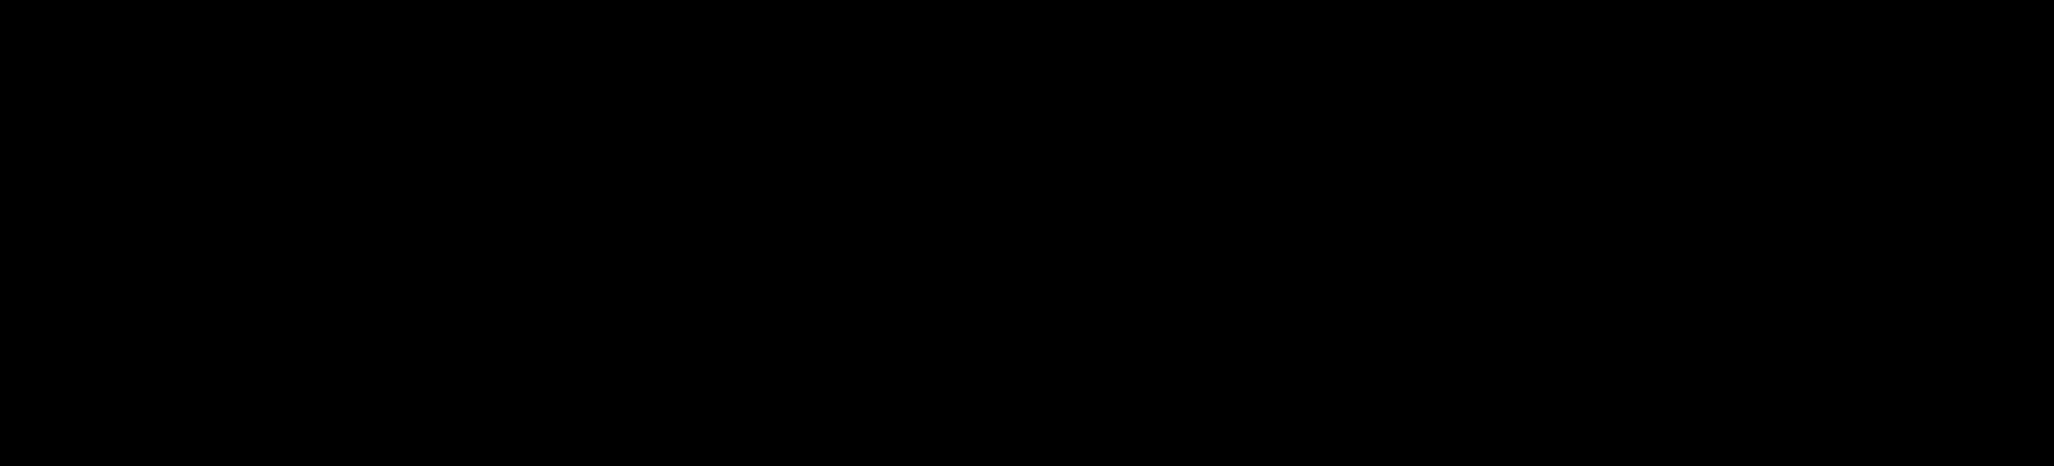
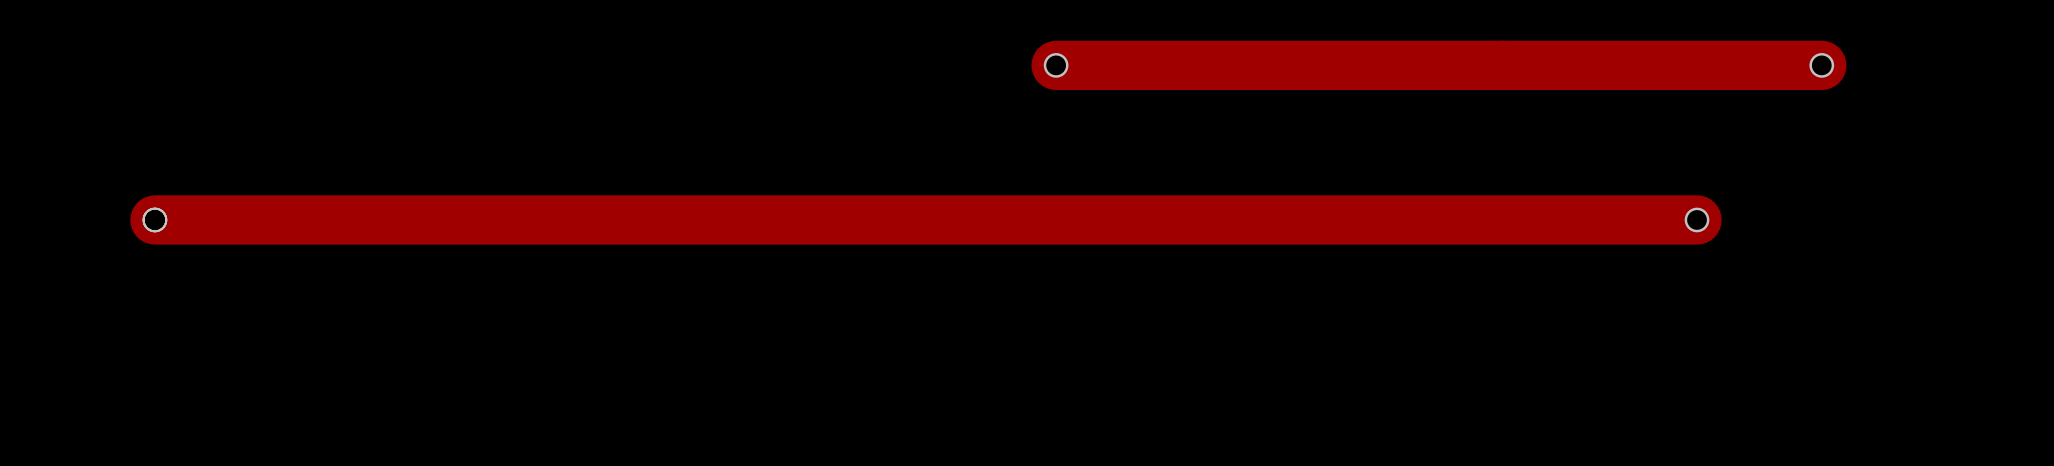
track: none -> (1056, 65) (1821, 65)
via: none -> (1056, 65)
via: none -> (1821, 65)
track: none -> (154, 219) (1697, 219)
via: none -> (154, 219)
via: none -> (1697, 219)

